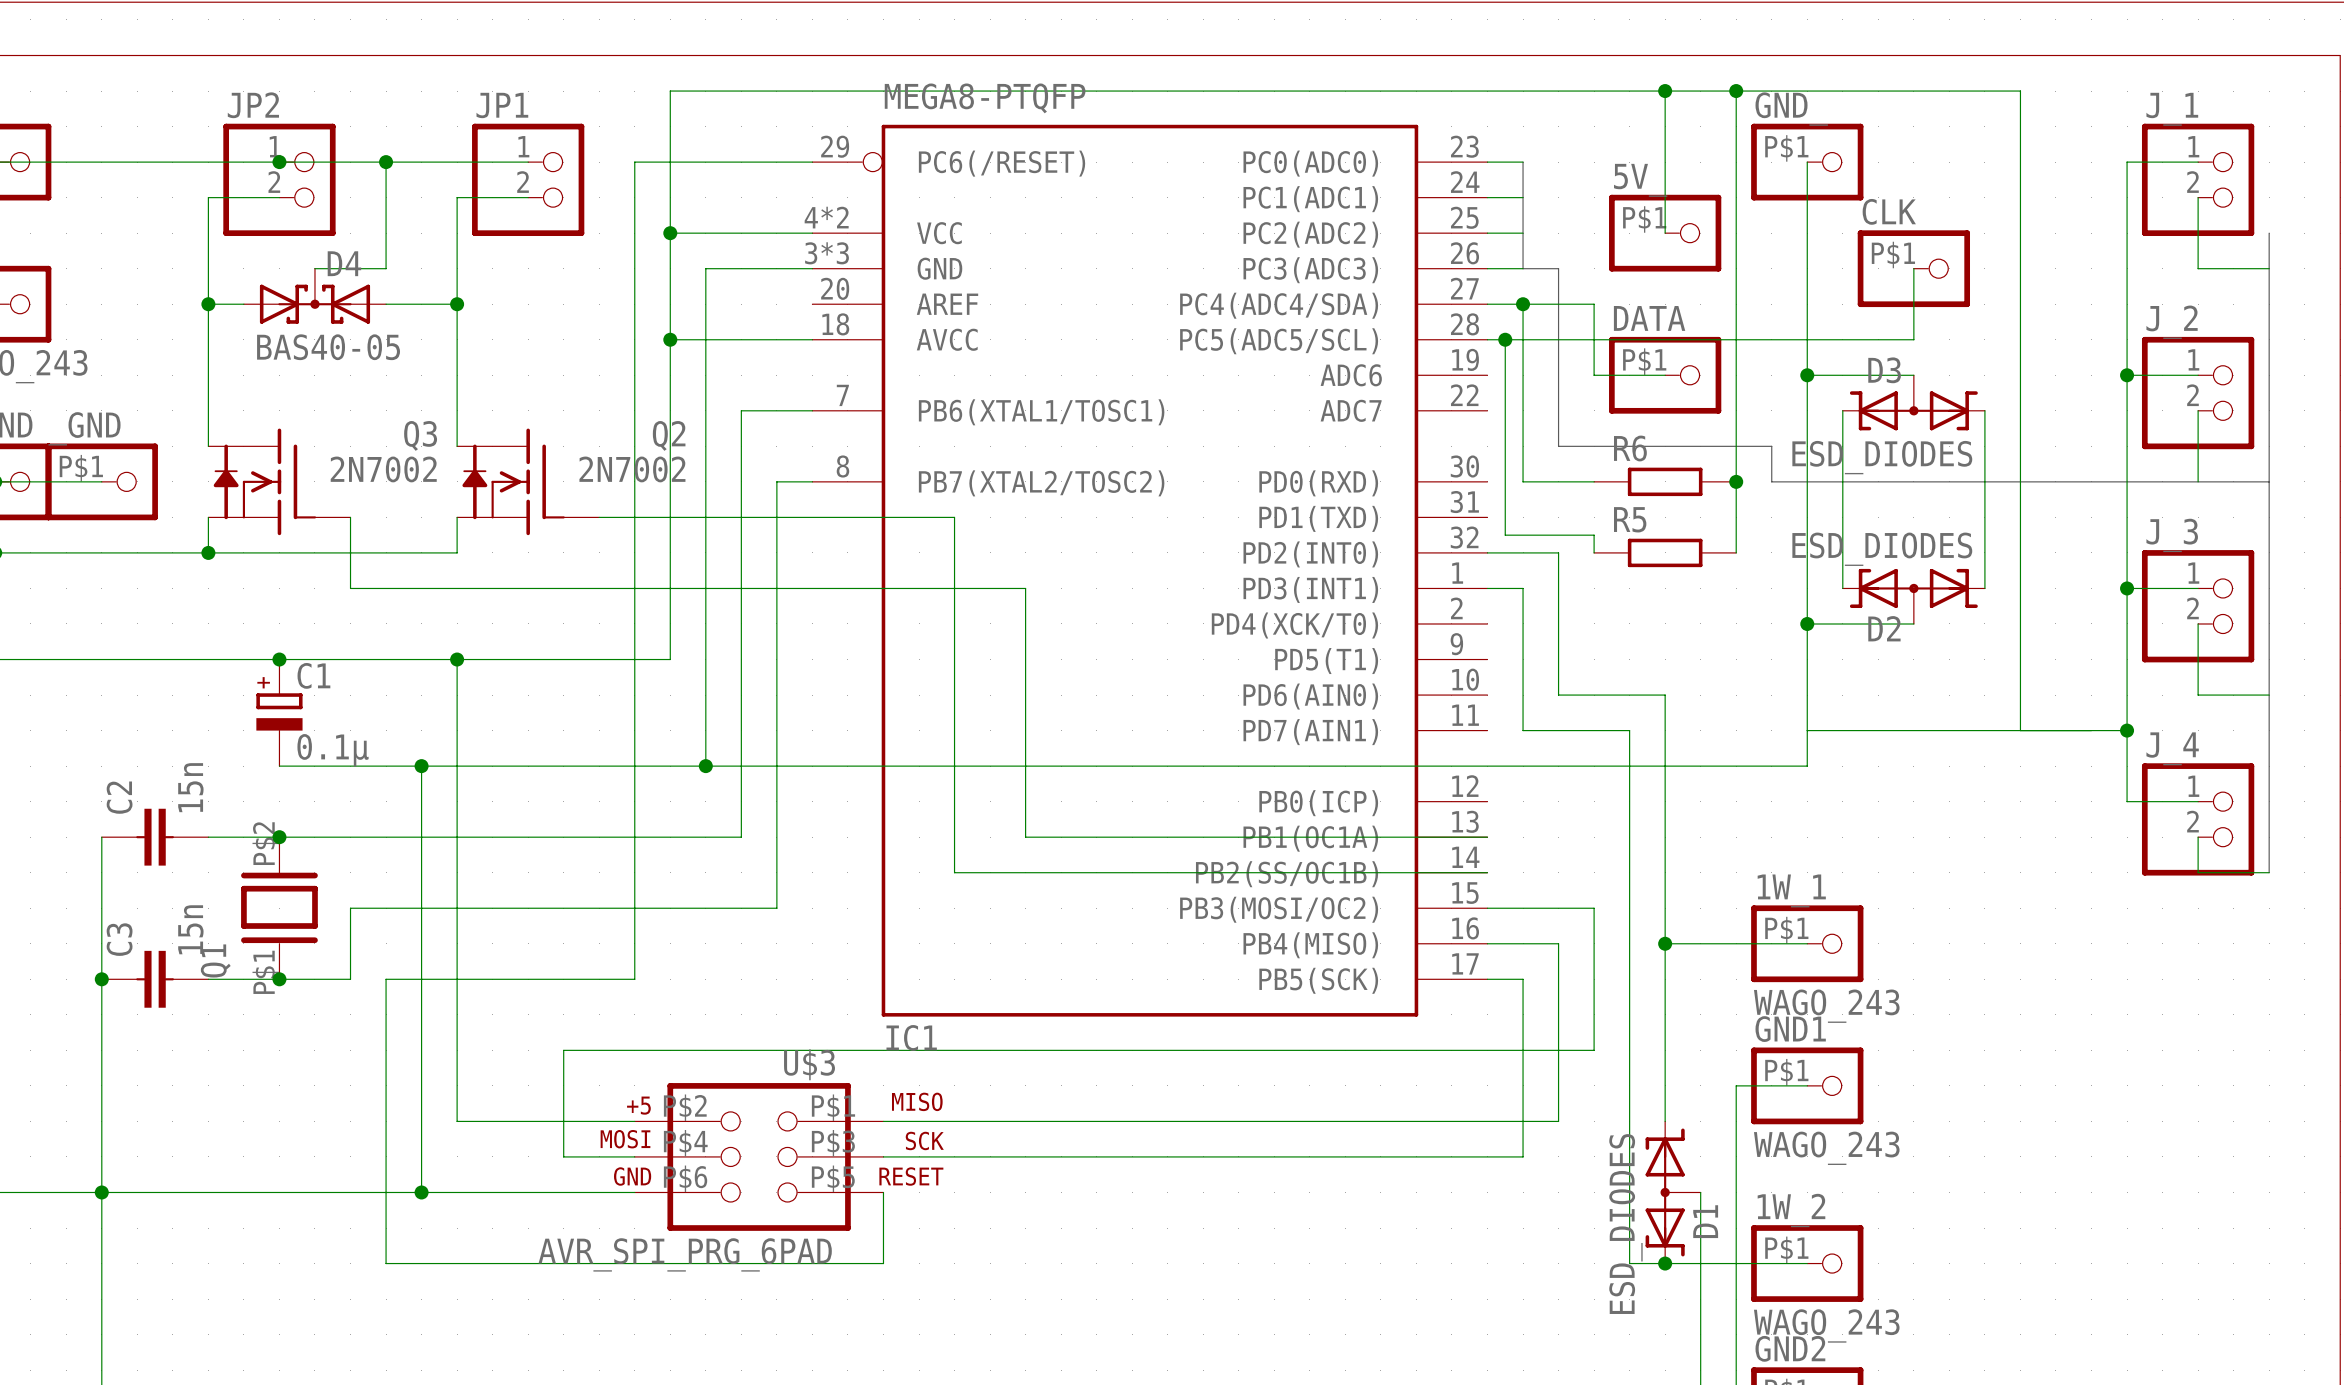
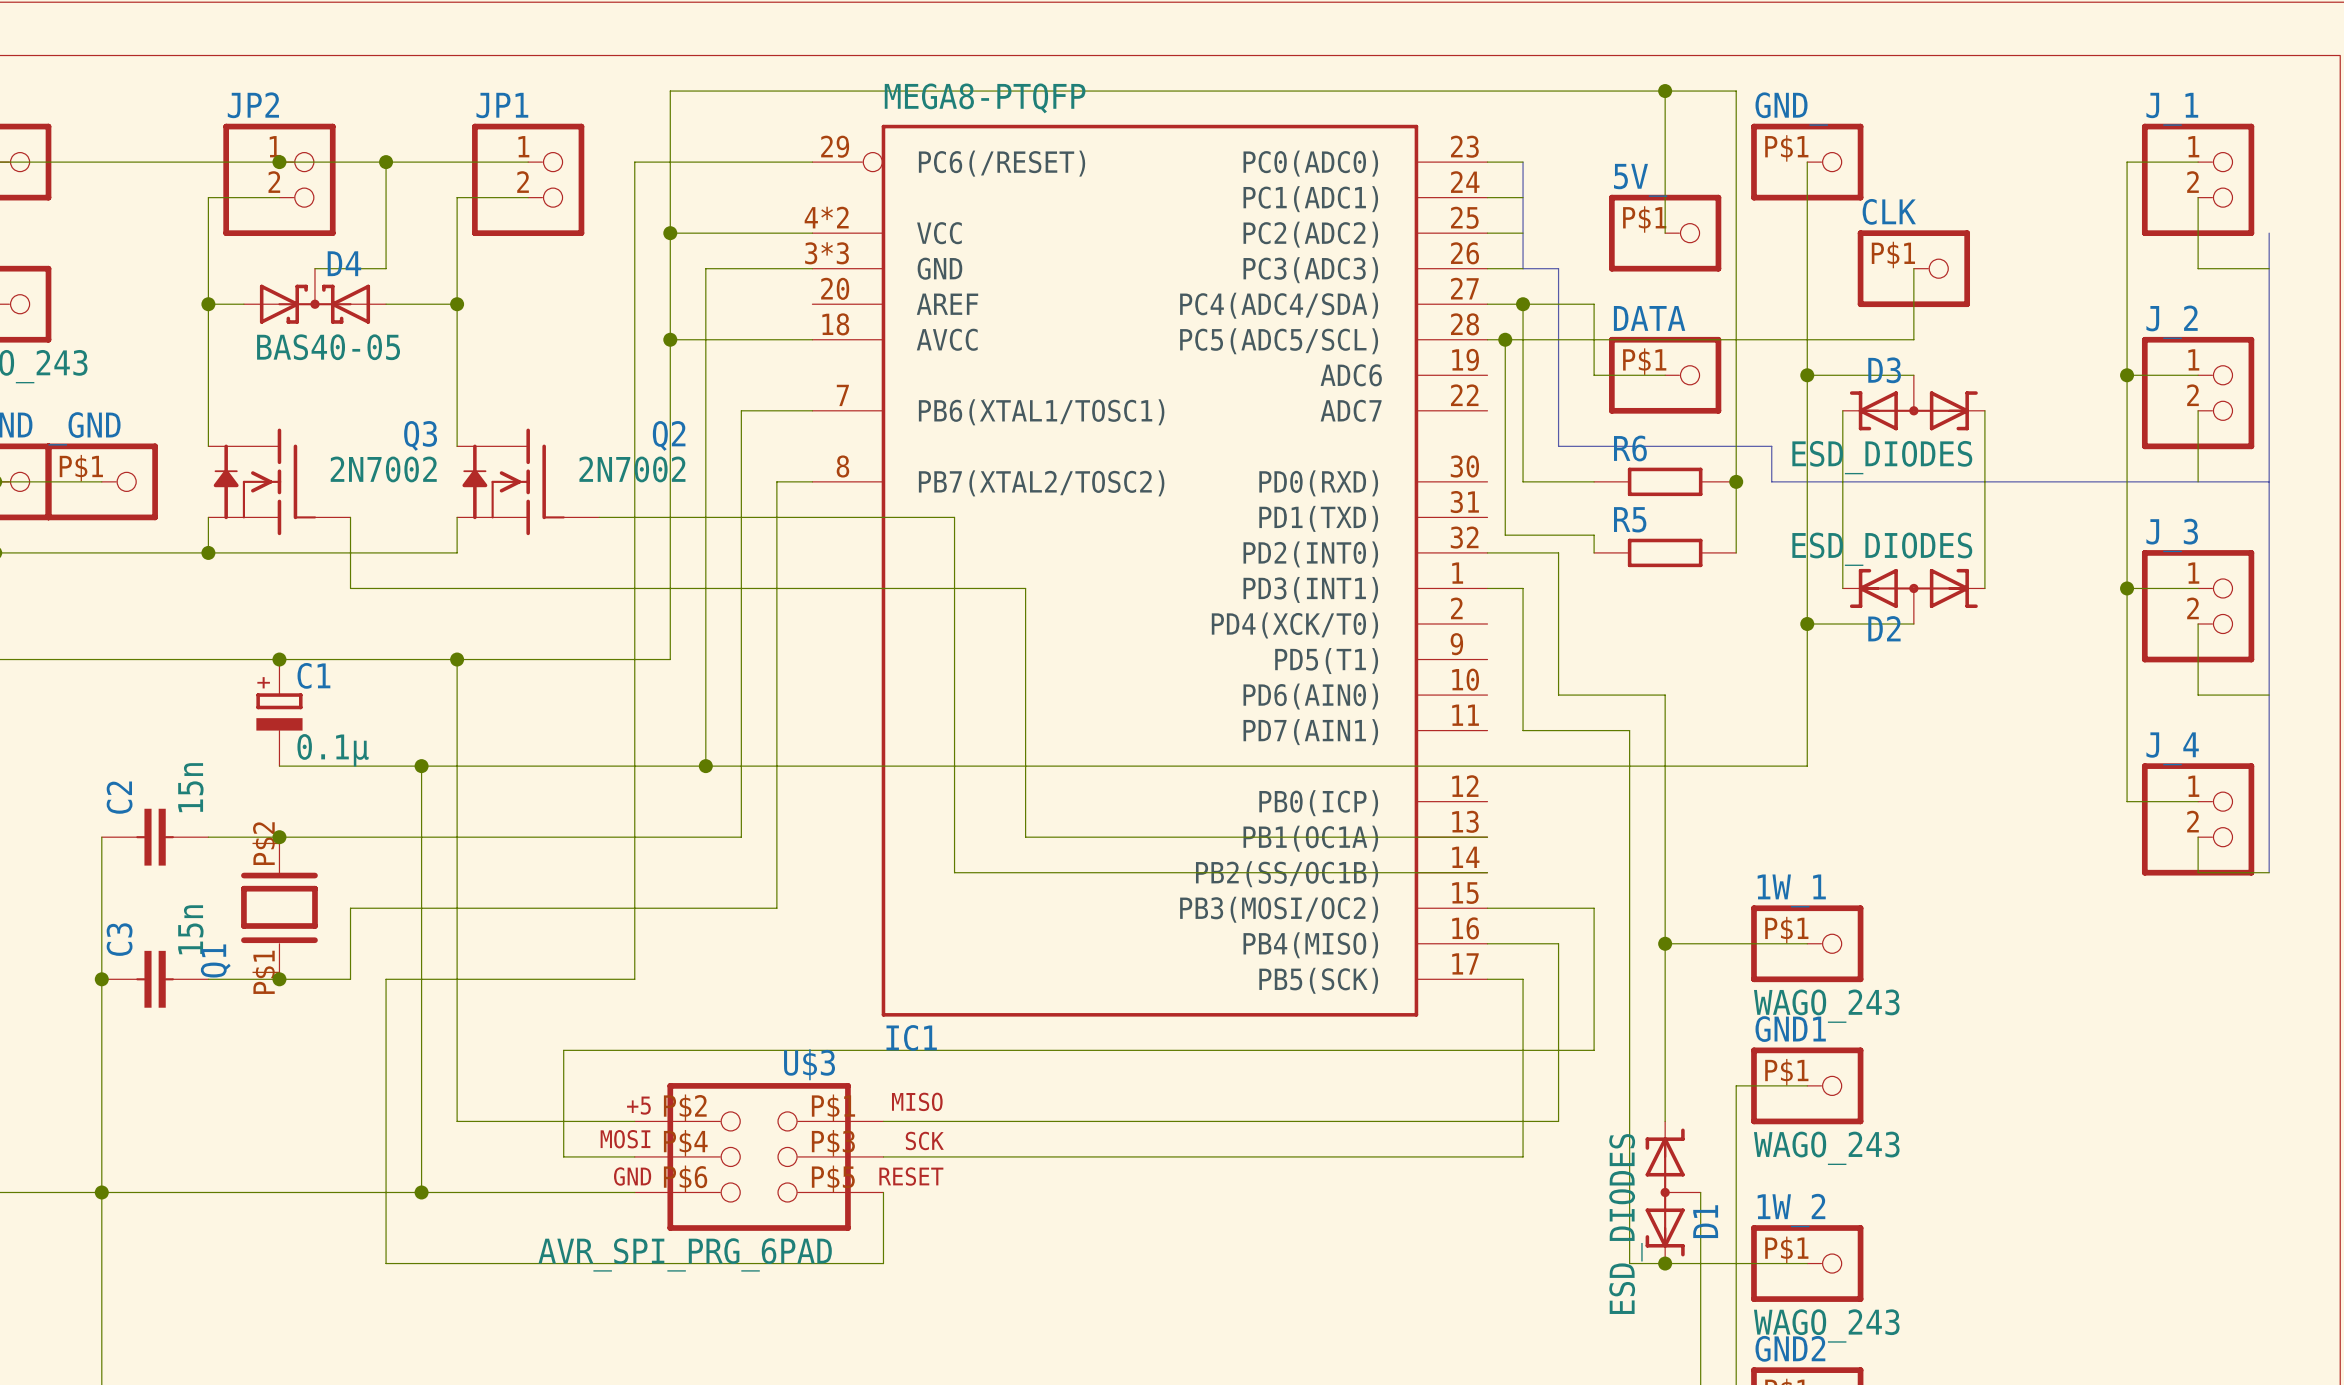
wire: (1736, 91) (2020, 91) (2020, 730) -> none
junction: (1736, 91) -> none
wire: (1807, 730) (2127, 730) -> none
junction: (2127, 730) -> none

